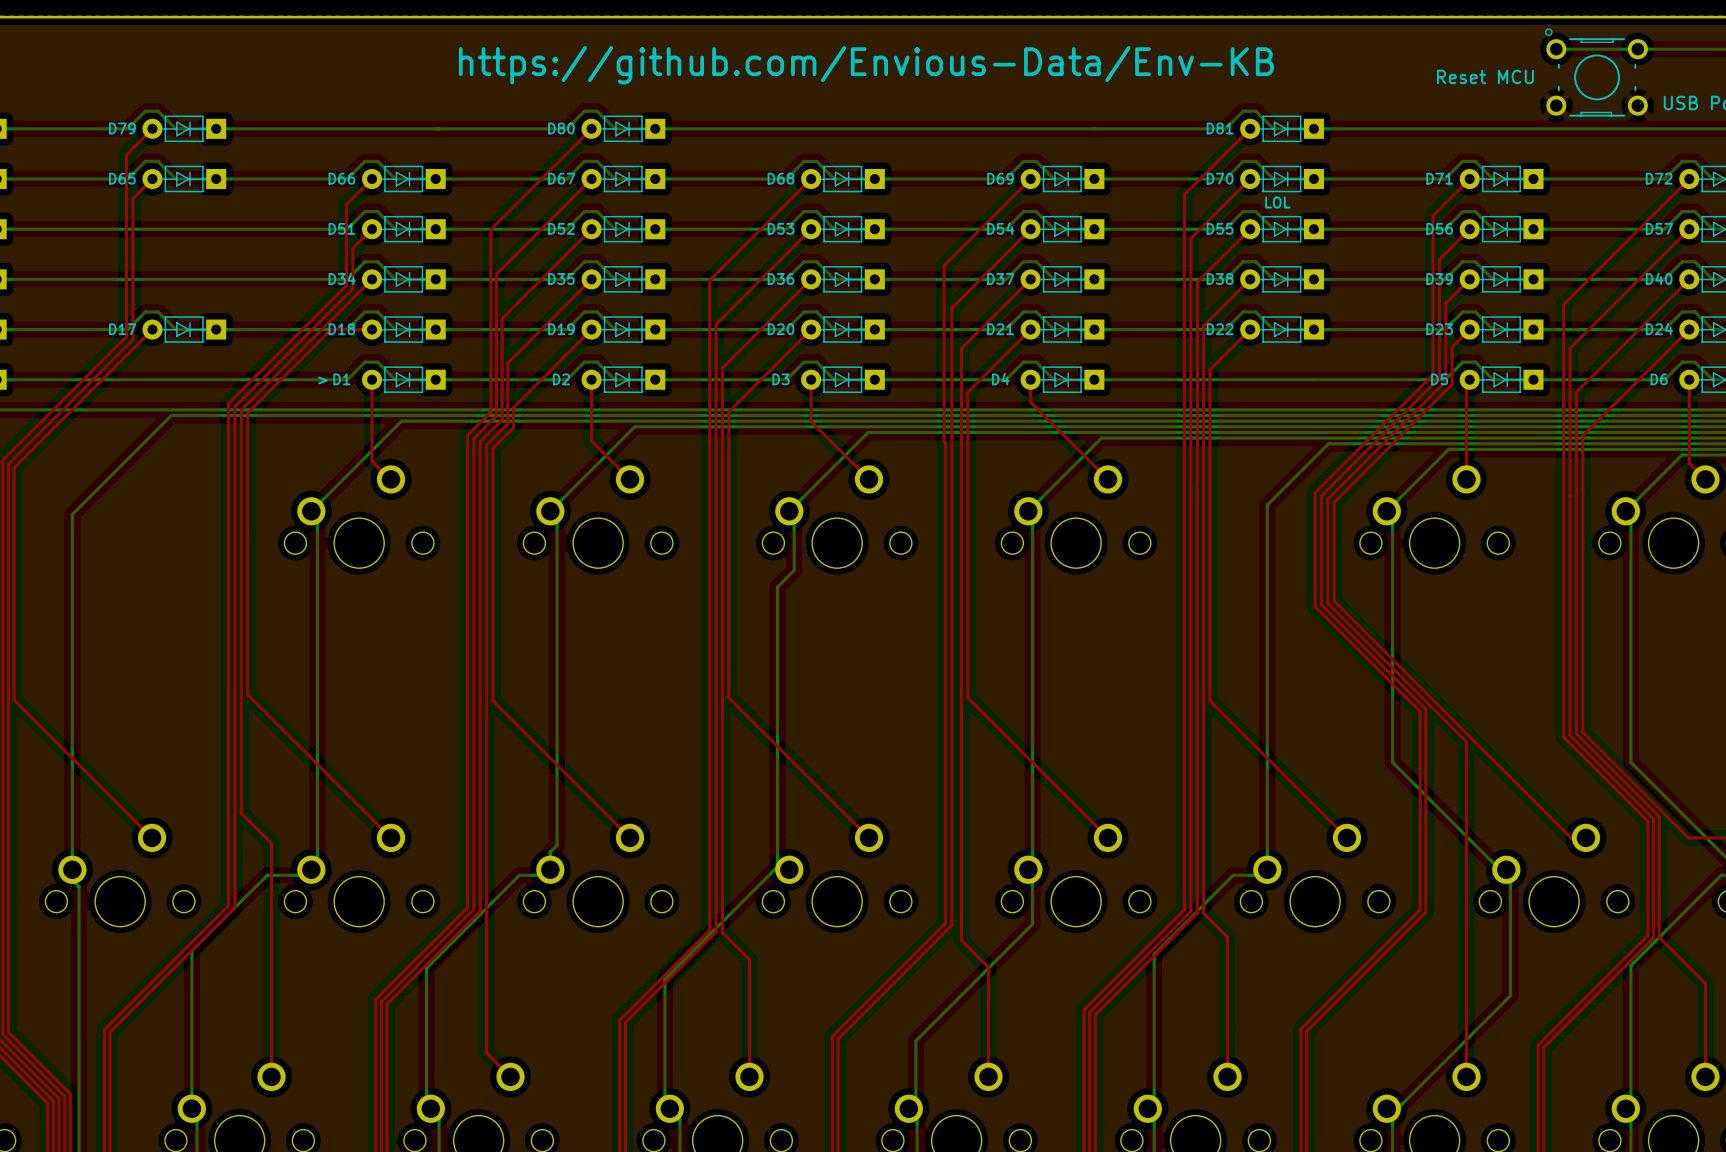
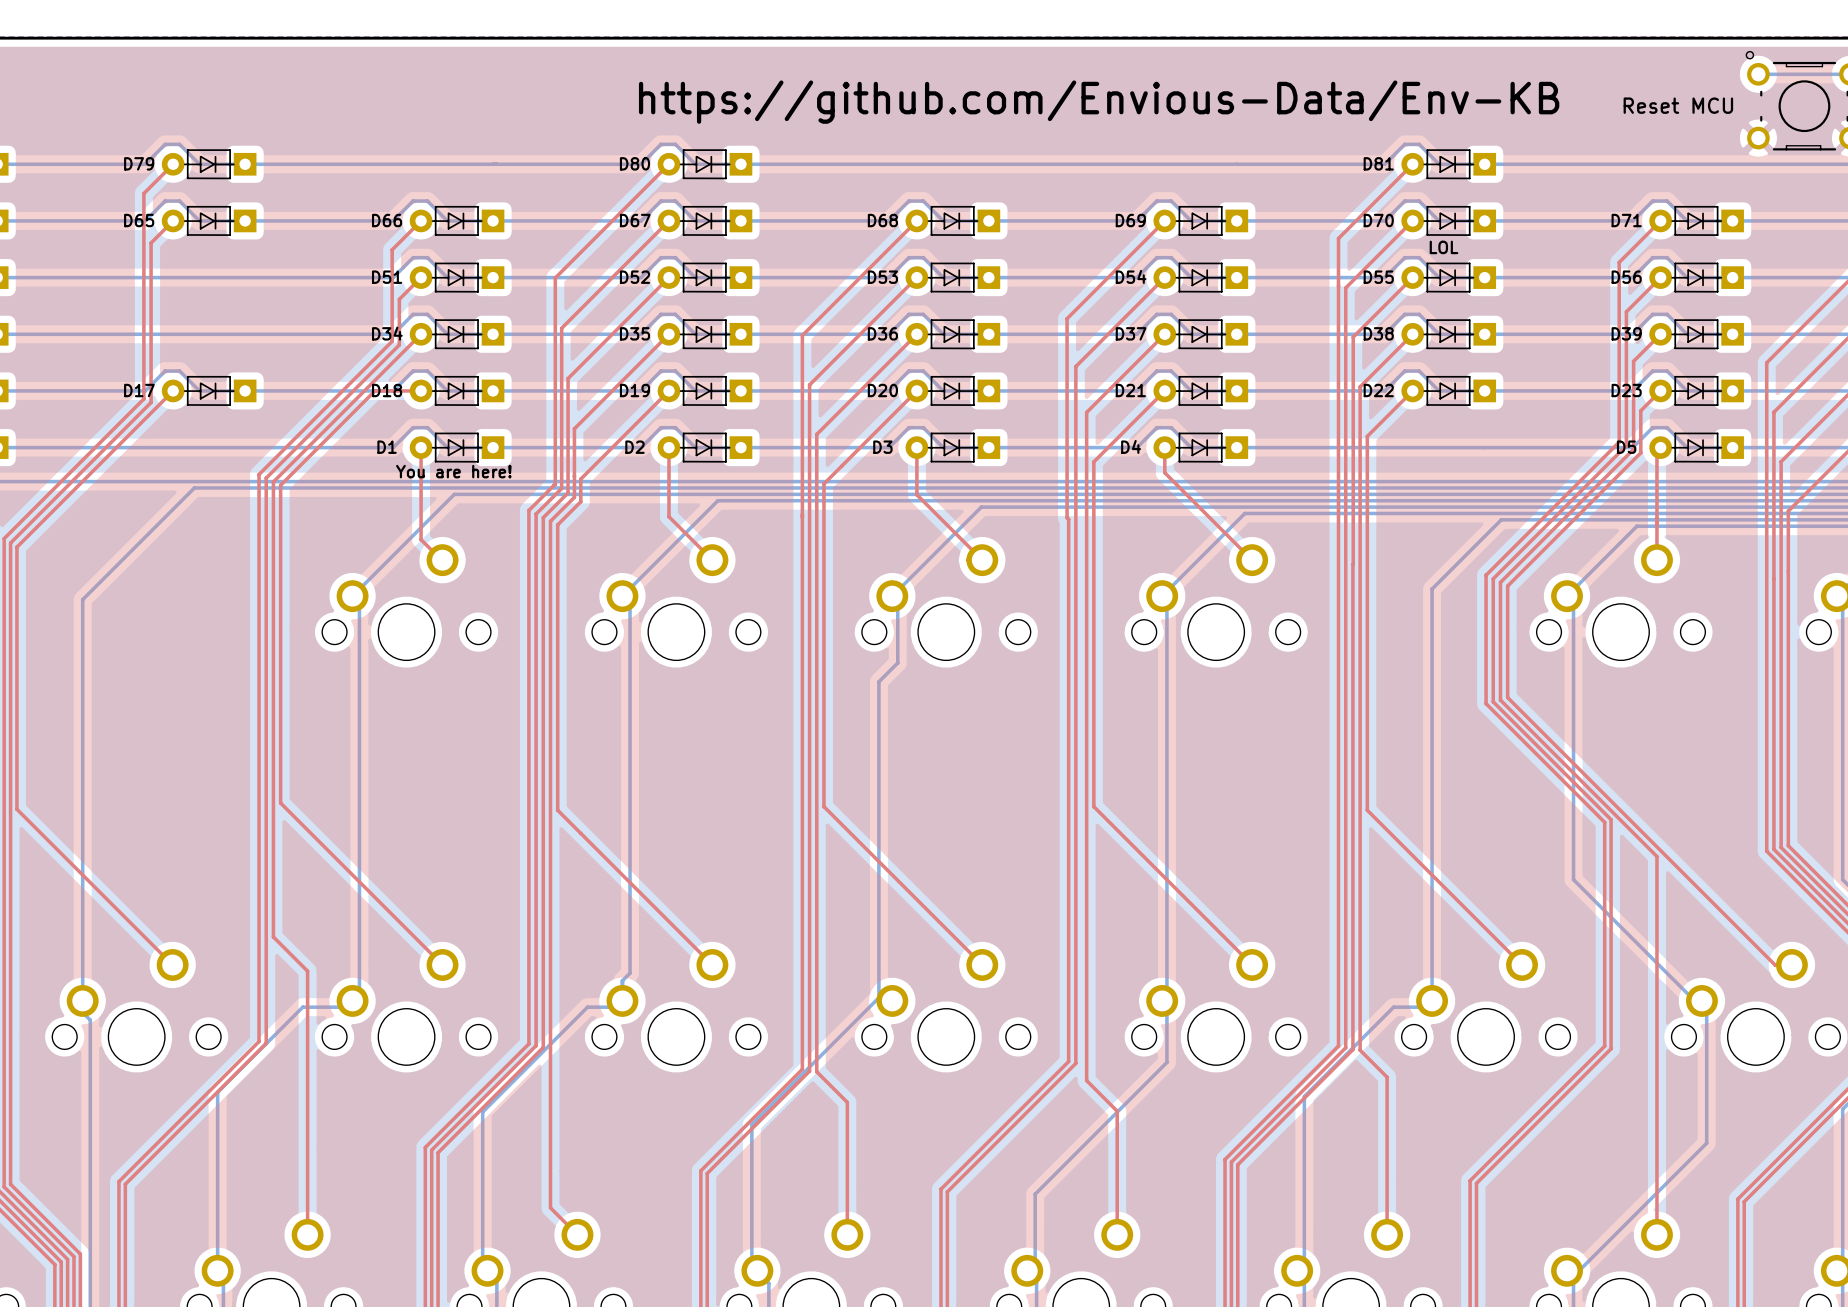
text: https://github.com/Envious-Data/Env-KB (866, 65) -> none
text: none -> https://github.com/Envious-Data/Env-KB (1099, 102)
text: > (323, 380) -> none
text: none -> You are here! (453, 471)

